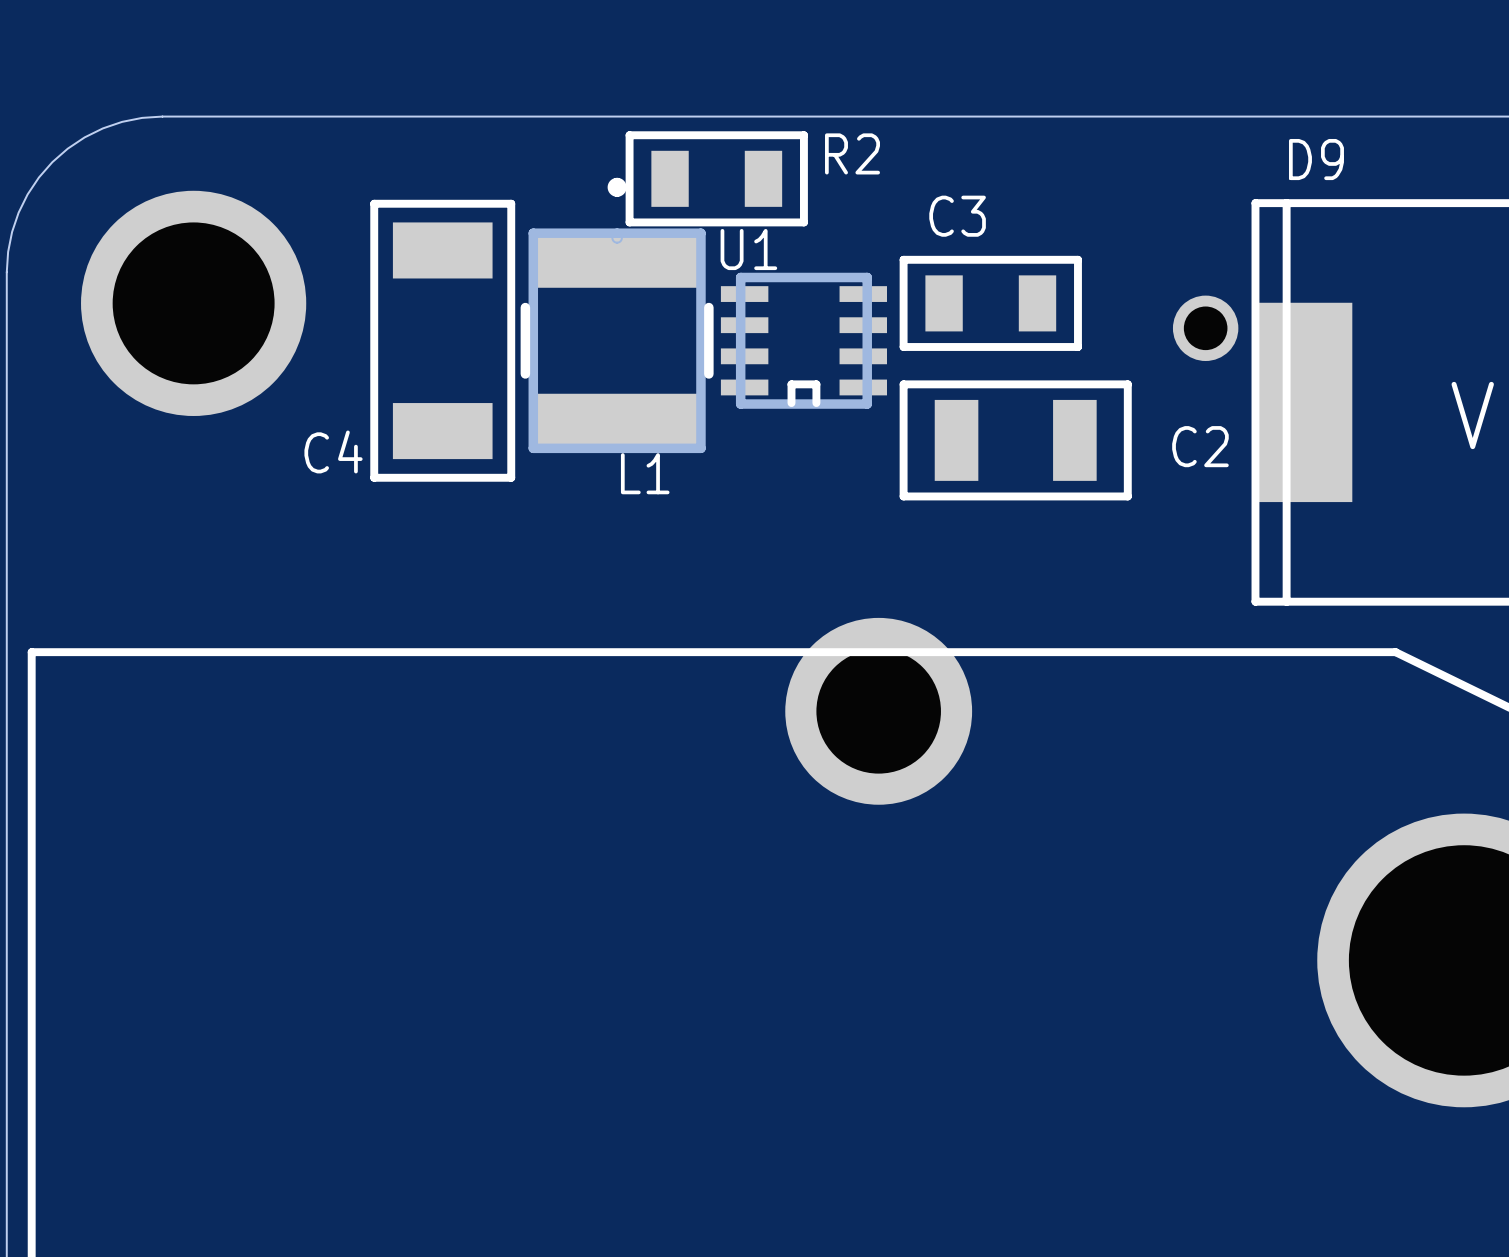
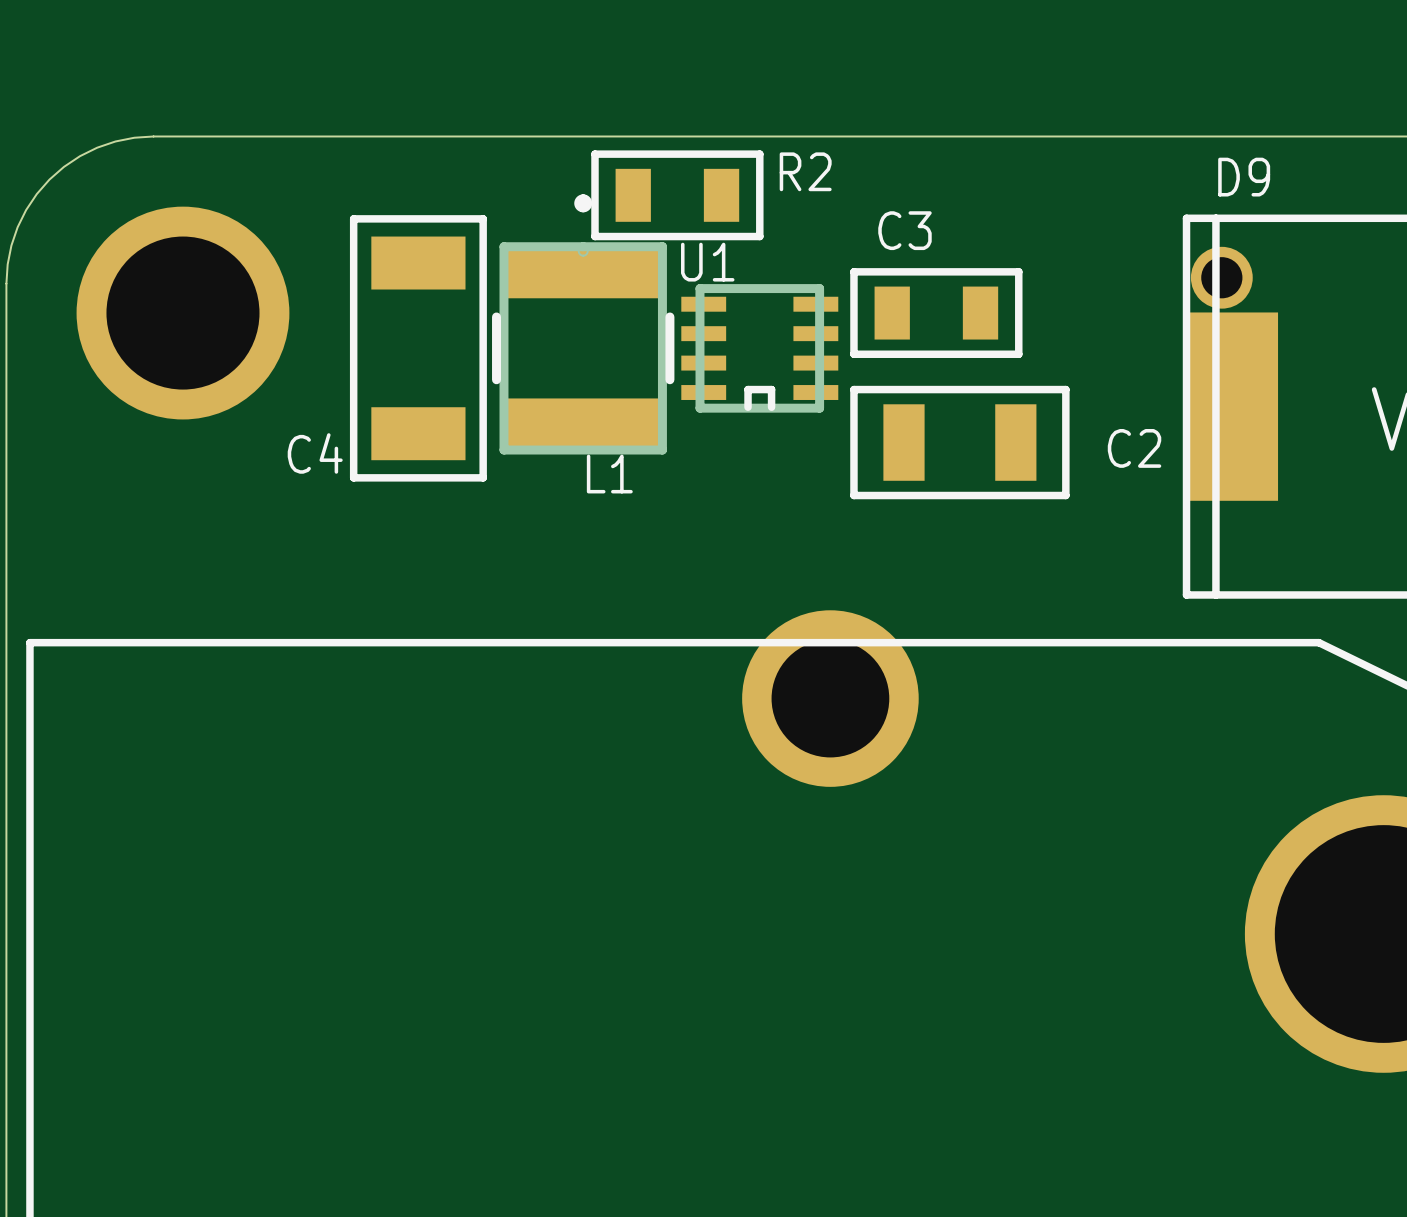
part position: (1205, 328) -> (1221, 277)

